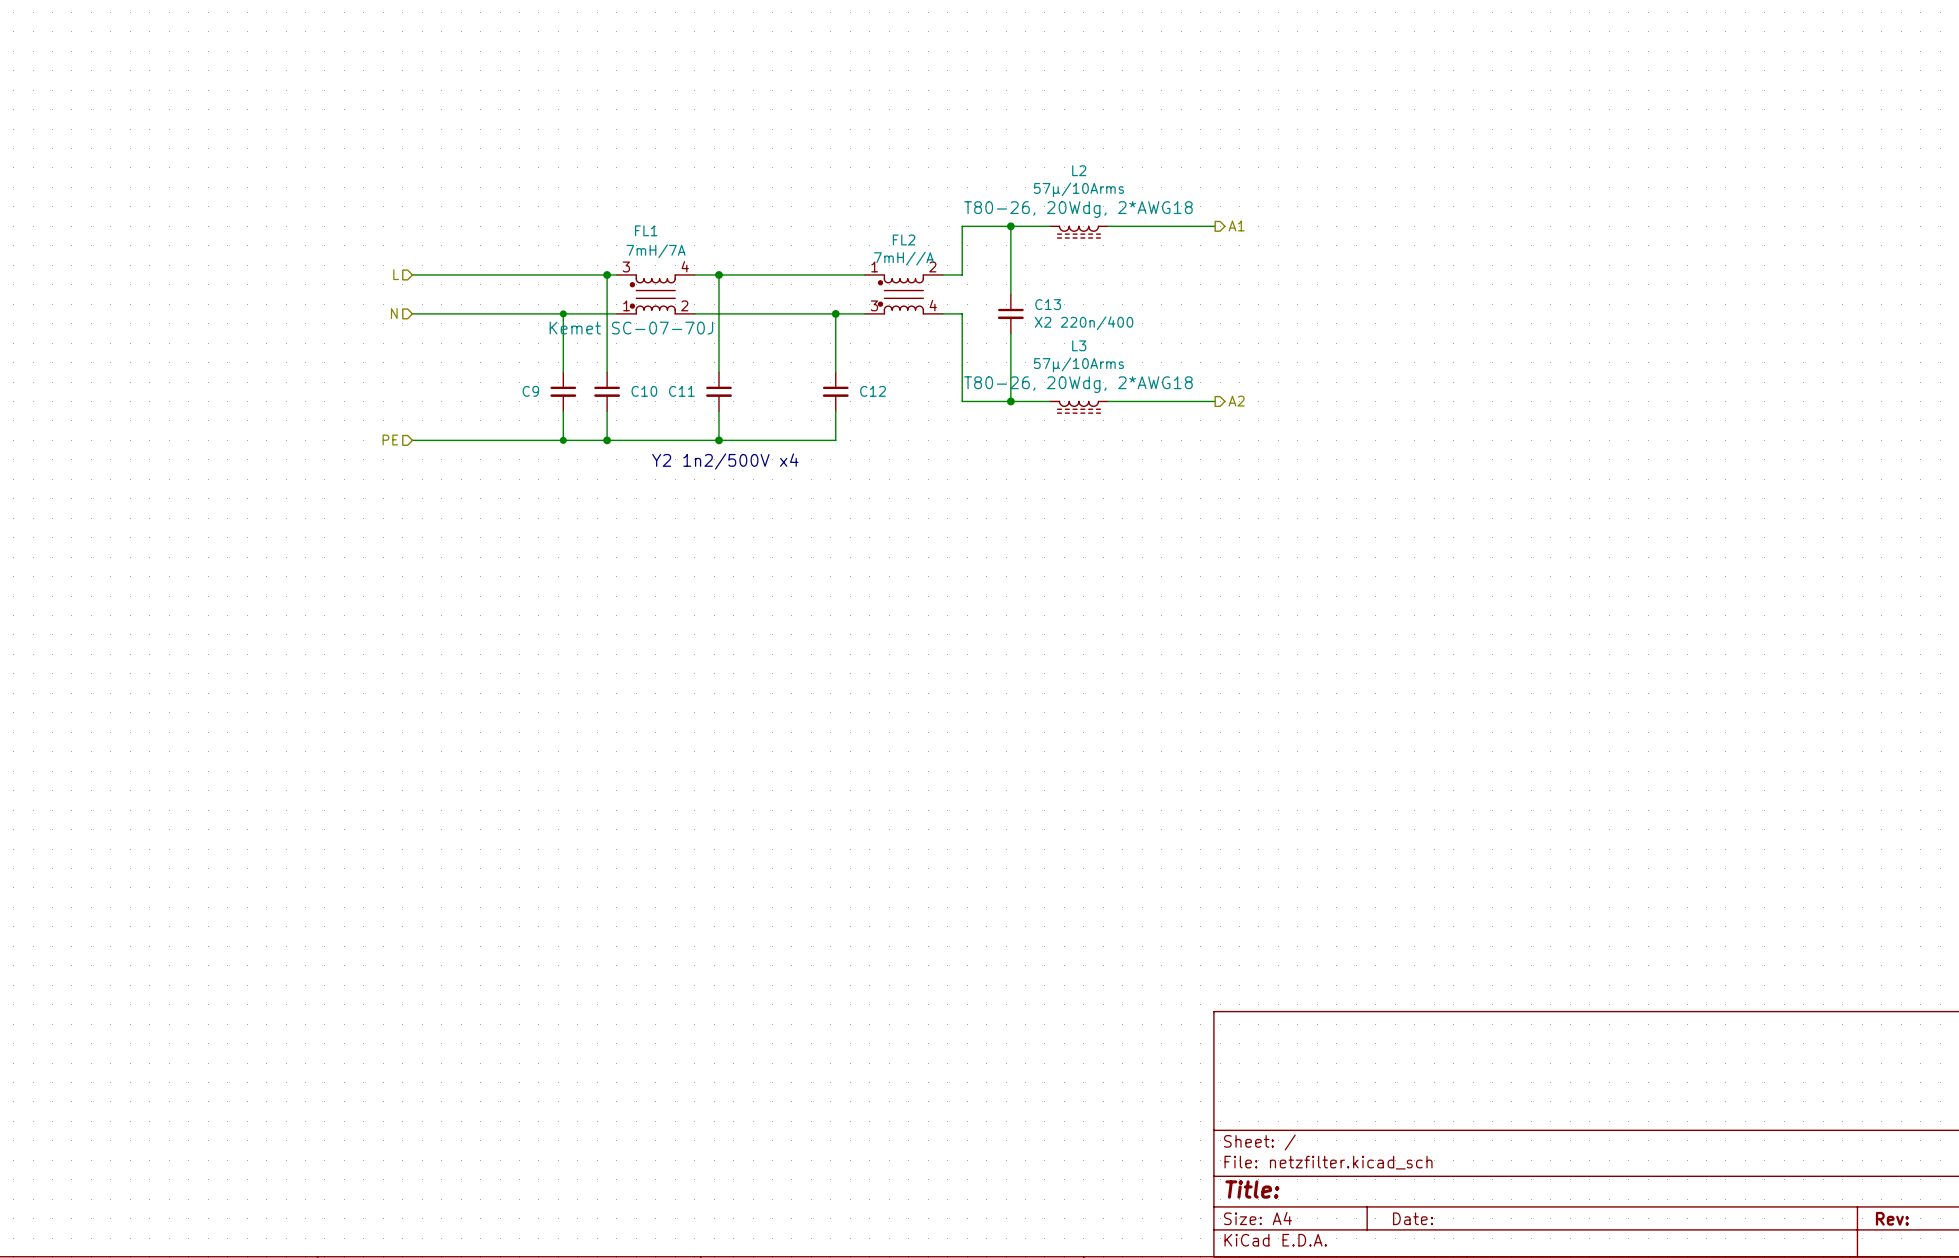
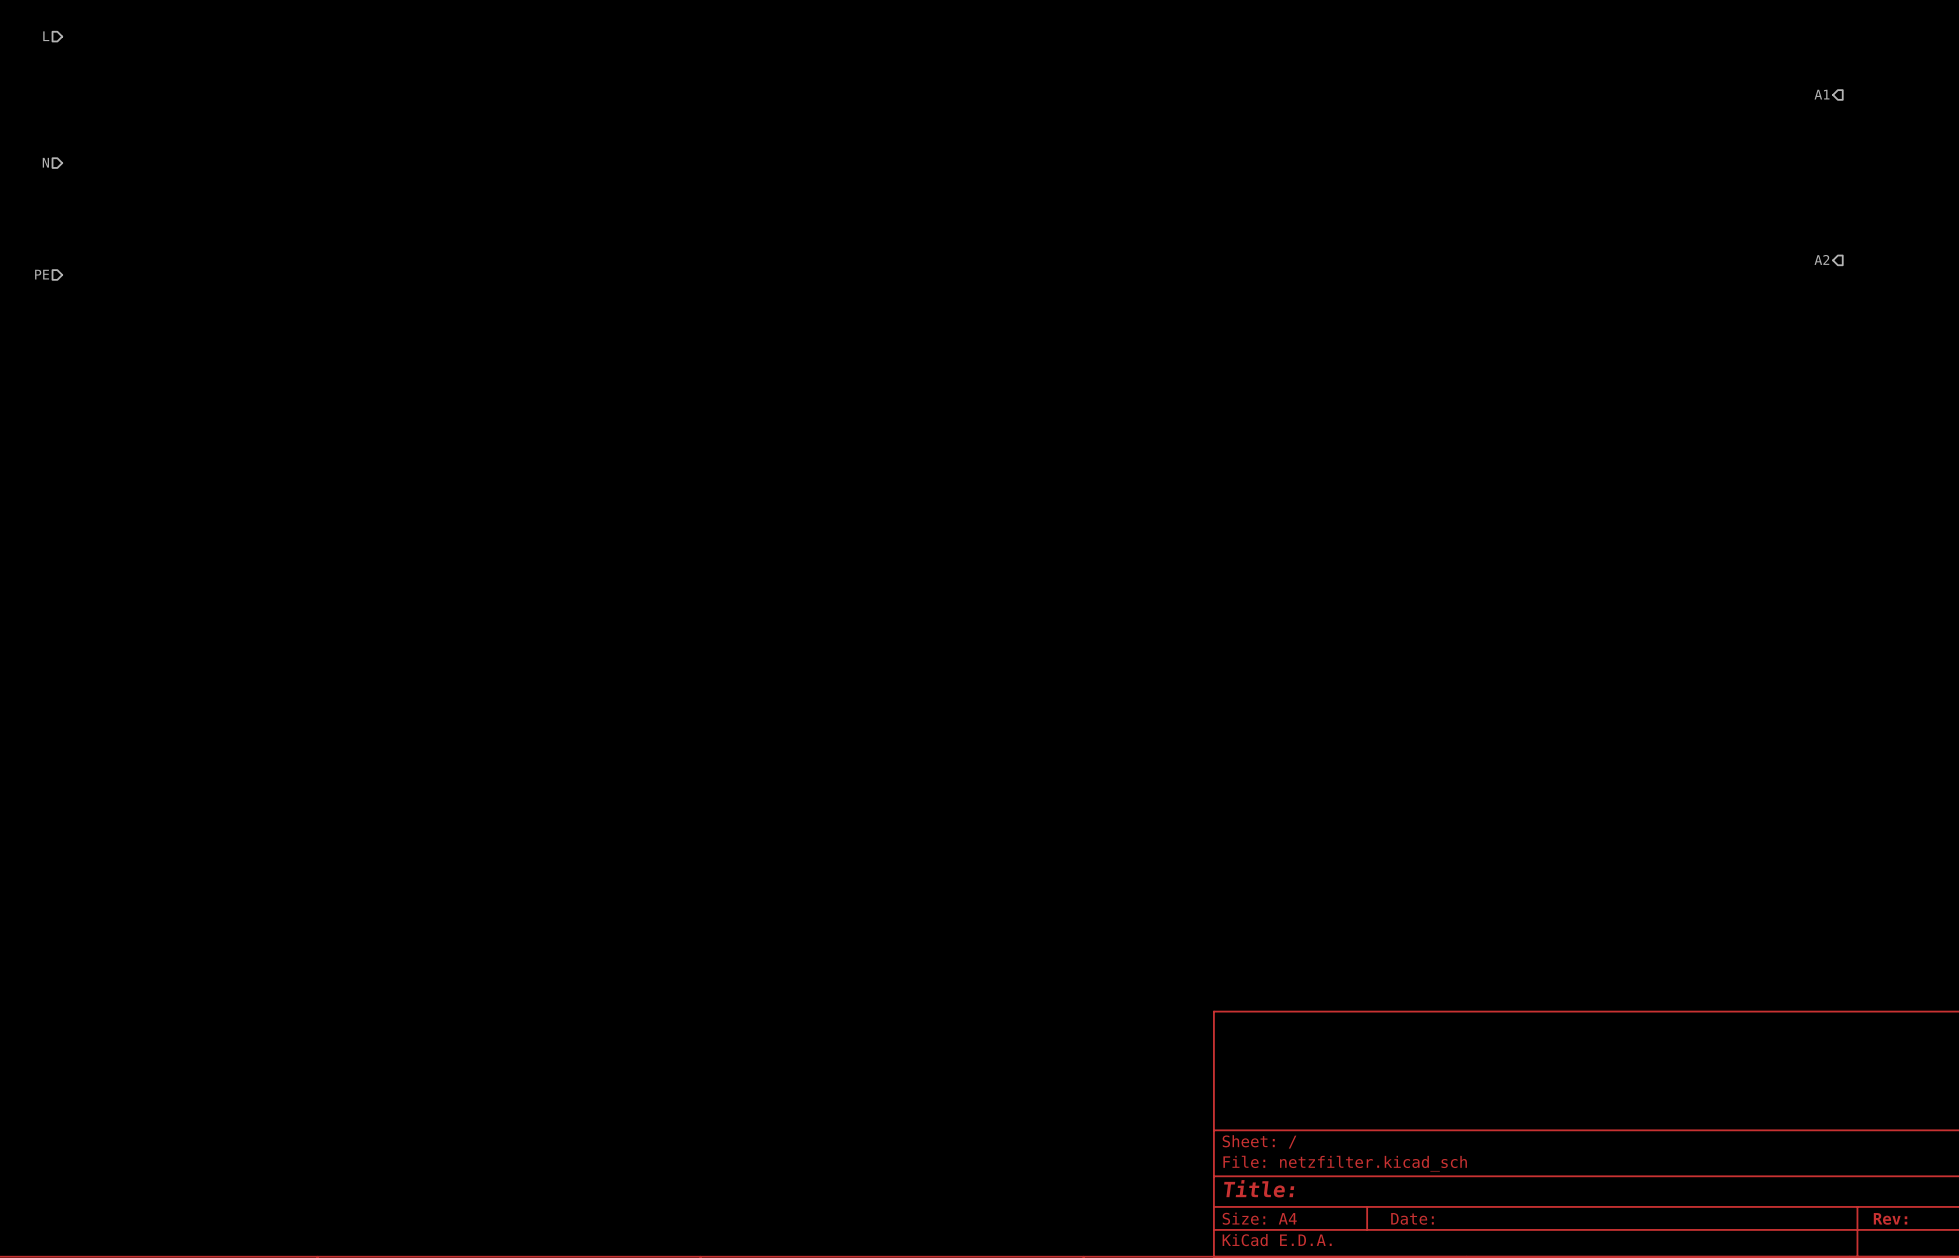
hierarchical label: none -> L (46, 36)
hierarchical label: none -> A1 (1822, 94)
hierarchical label: none -> N (45, 162)
hierarchical label: A1 (1236, 225) -> none
wire: (1010, 226) (1010, 294) -> none
junction: (1010, 226) -> none
wire: (1049, 226) (962, 226) (962, 274) (942, 274) -> none
wire: (1108, 226) (1215, 226) -> none
L2: 57µ/10Arms (1078, 232) -> none
hierarchical label: none -> A2 (1821, 259)
hierarchical label: none -> PE (42, 274)
hierarchical label: L (396, 274) -> none
wire: (412, 274) (616, 274) -> none
wire: (607, 274) (607, 372) -> none
junction: (607, 274) -> none
wire: (694, 274) (864, 274) -> none
wire: (718, 274) (718, 372) -> none
junction: (718, 274) -> none
FL1: 7mH/7A (655, 294) -> none
FL2: 7mH//A (903, 294) -> none
hierarchical label: N (394, 313) -> none
wire: (412, 313) (616, 313) -> none
wire: (563, 313) (563, 372) -> none
junction: (563, 313) -> none
wire: (694, 313) (864, 313) -> none
wire: (835, 313) (835, 372) -> none
junction: (835, 313) -> none
wire: (942, 313) (962, 313) (962, 401) (1049, 401) -> none
C13: X2 220n/400 (1010, 313) -> none
wire: (1010, 333) (1010, 401) -> none
C9: (563, 391) -> none
C10: (607, 391) -> none
C11: (718, 391) -> none
C12: (835, 391) -> none
junction: (1010, 401) -> none
wire: (1108, 401) (1215, 401) -> none
hierarchical label: A2 (1236, 401) -> none
L3: 57µ/10Arms (1078, 407) -> none
wire: (563, 411) (563, 440) -> none
wire: (607, 411) (607, 440) -> none
wire: (718, 411) (718, 440) -> none
wire: (835, 411) (835, 440) (412, 440) -> none
hierarchical label: PE (390, 440) -> none
junction: (563, 440) -> none
junction: (607, 440) -> none
junction: (718, 440) -> none
text: Y2 1n2/500V x4 (725, 461) -> none

